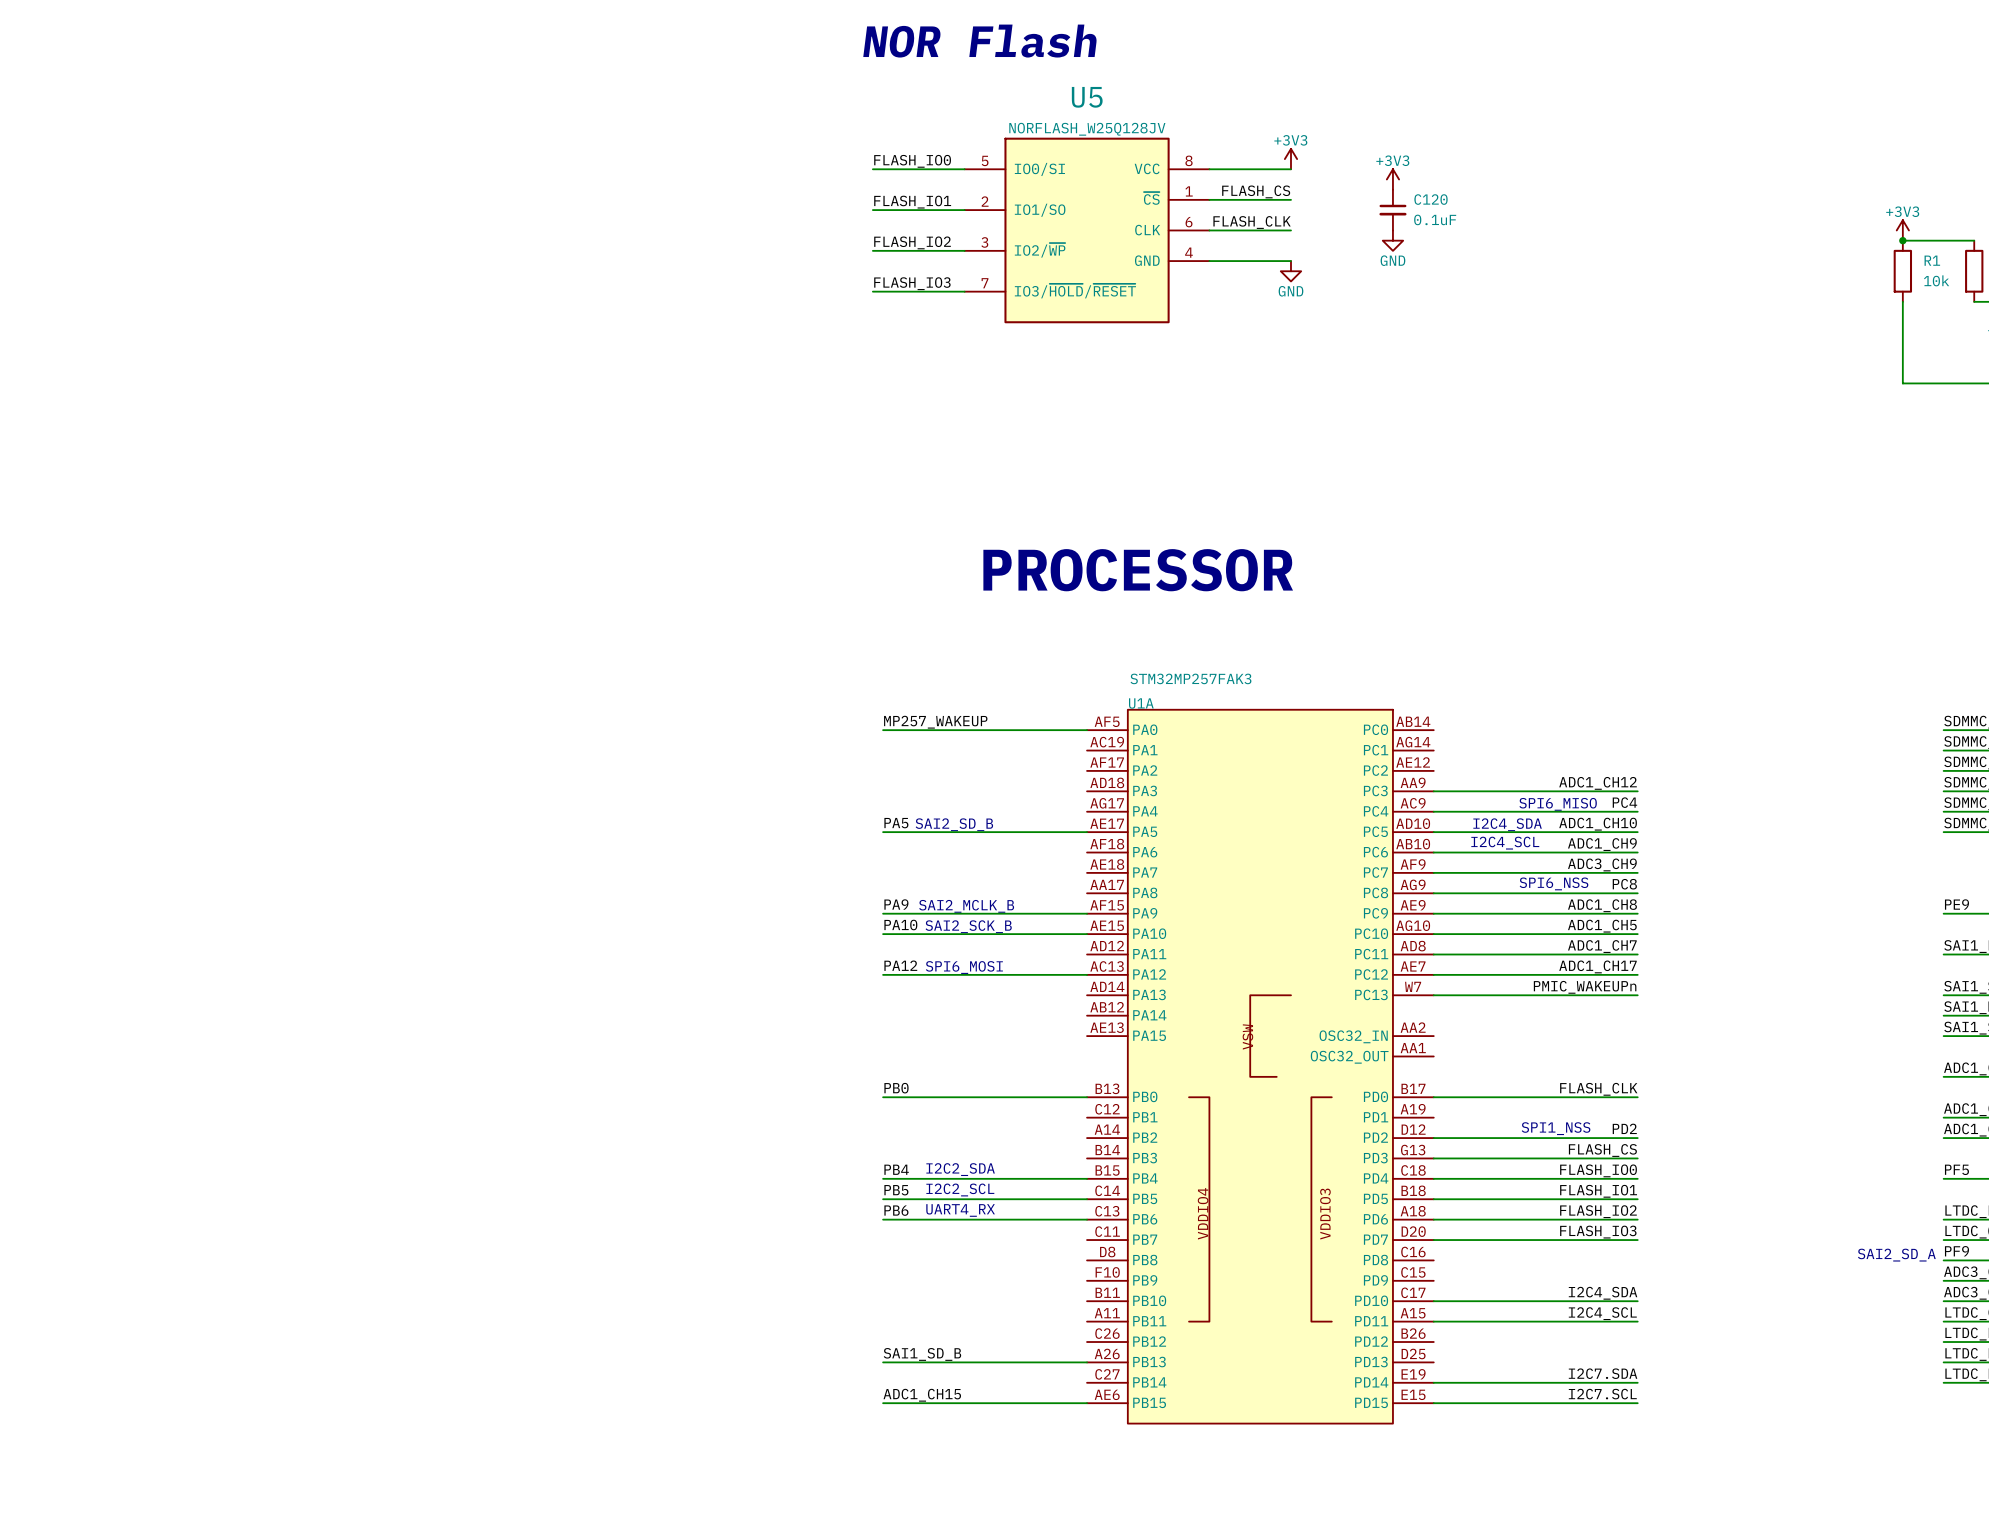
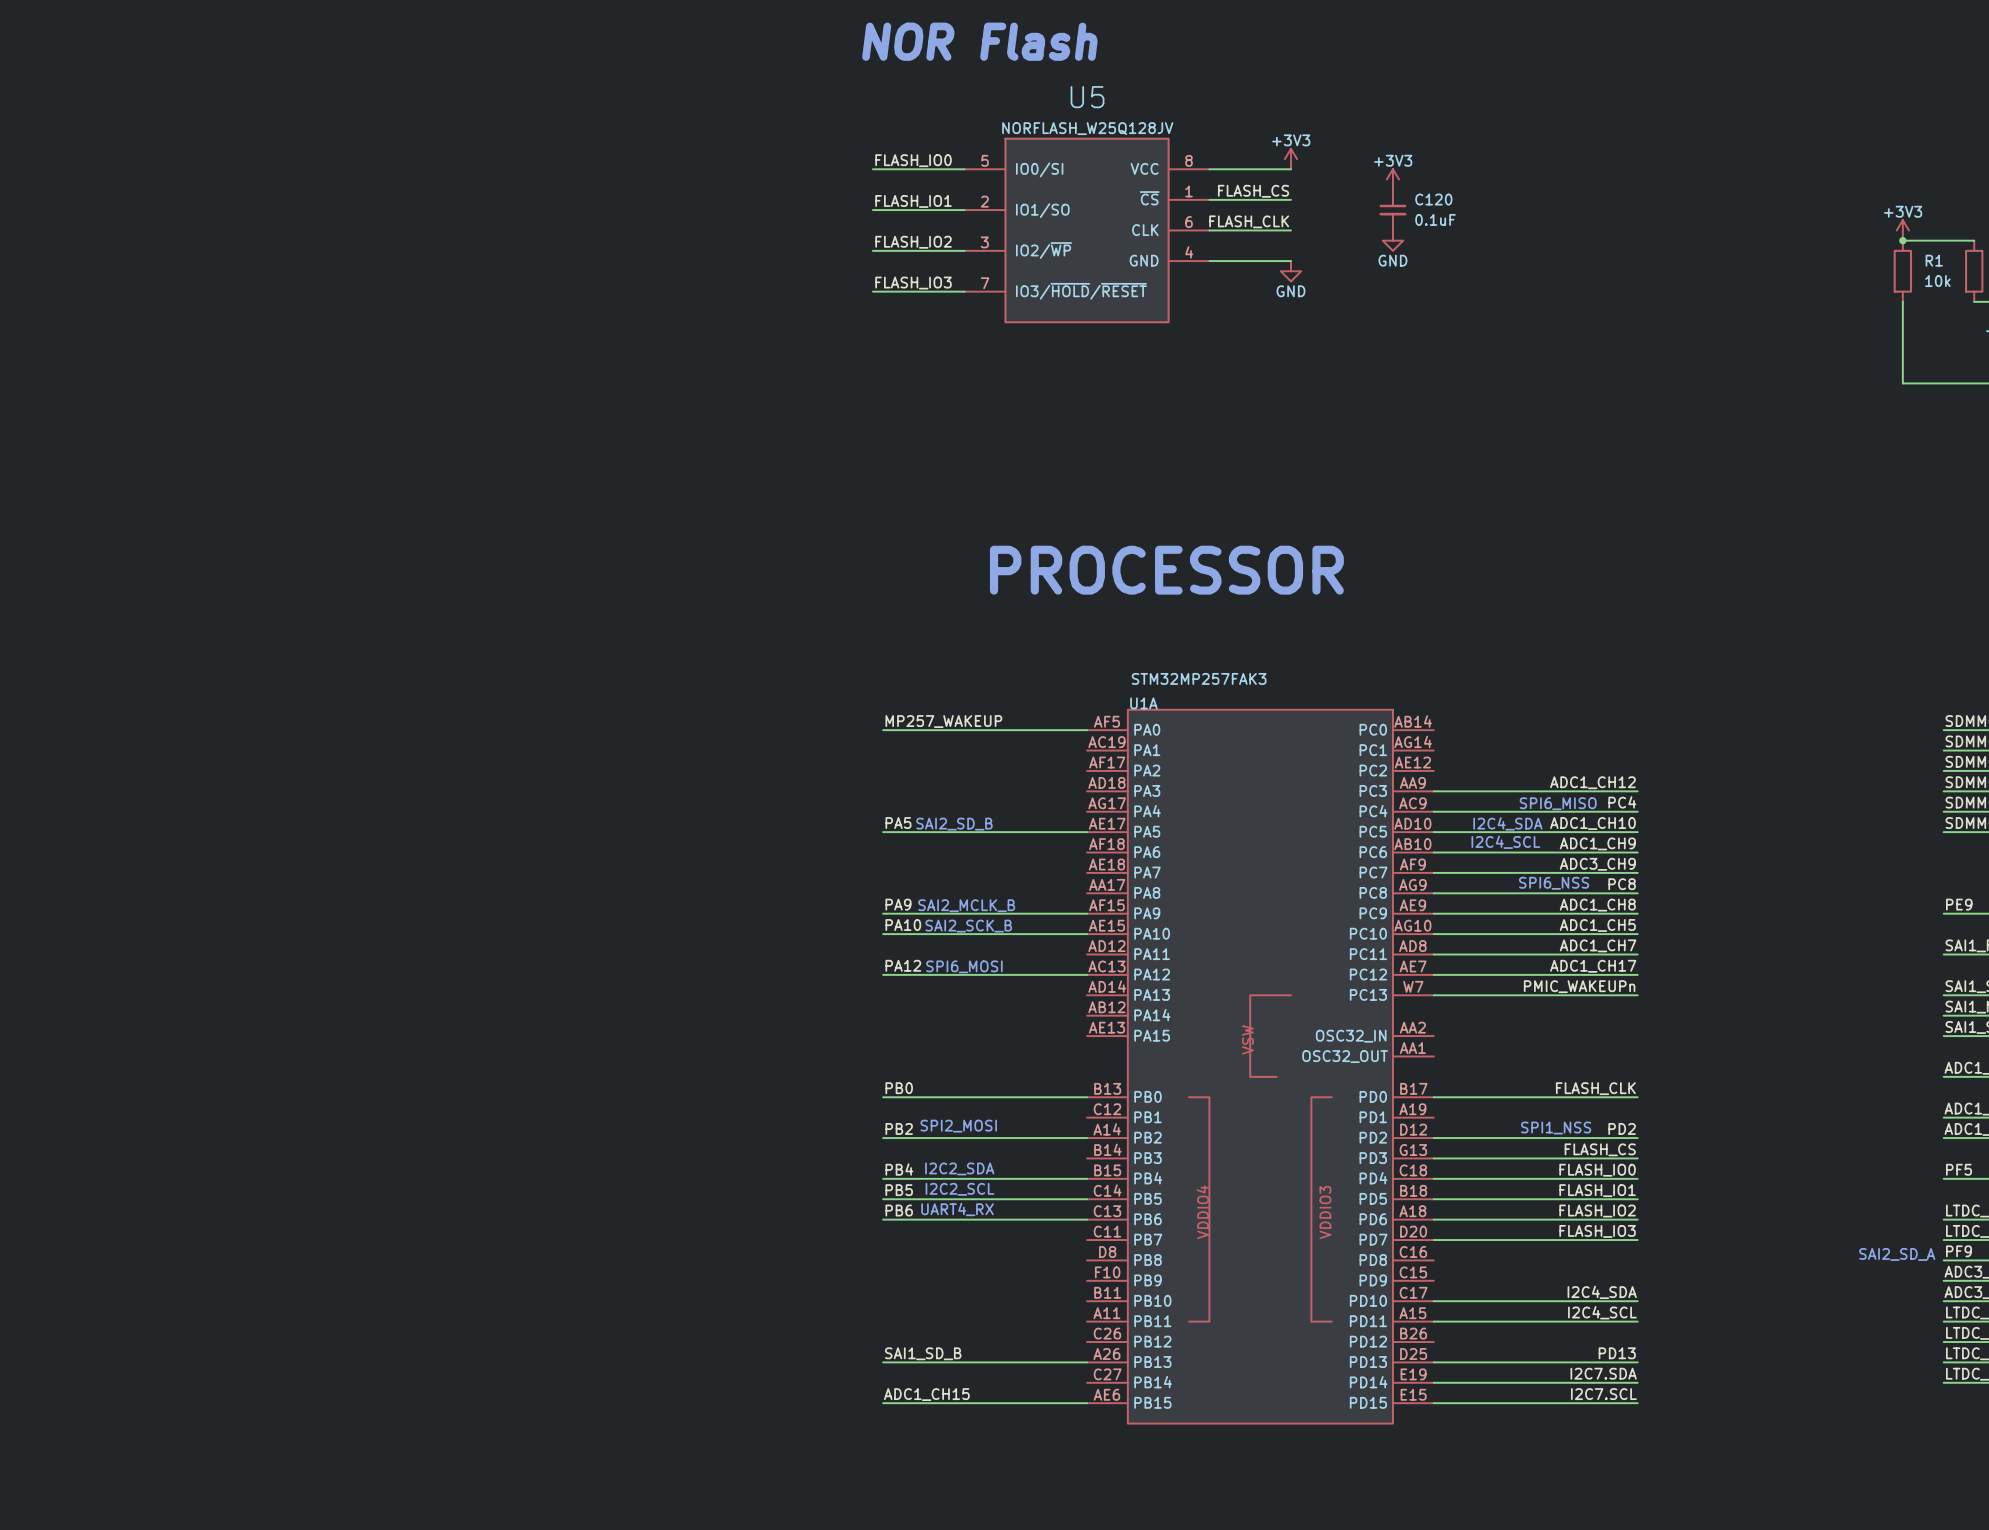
text: none -> SPI2_MOSI (958, 1126)
label: none -> PB2 (899, 1128)
wire: none -> (883, 1138) (1087, 1138)
label: none -> PD13 (1617, 1353)
wire: none -> (1433, 1362) (1637, 1362)

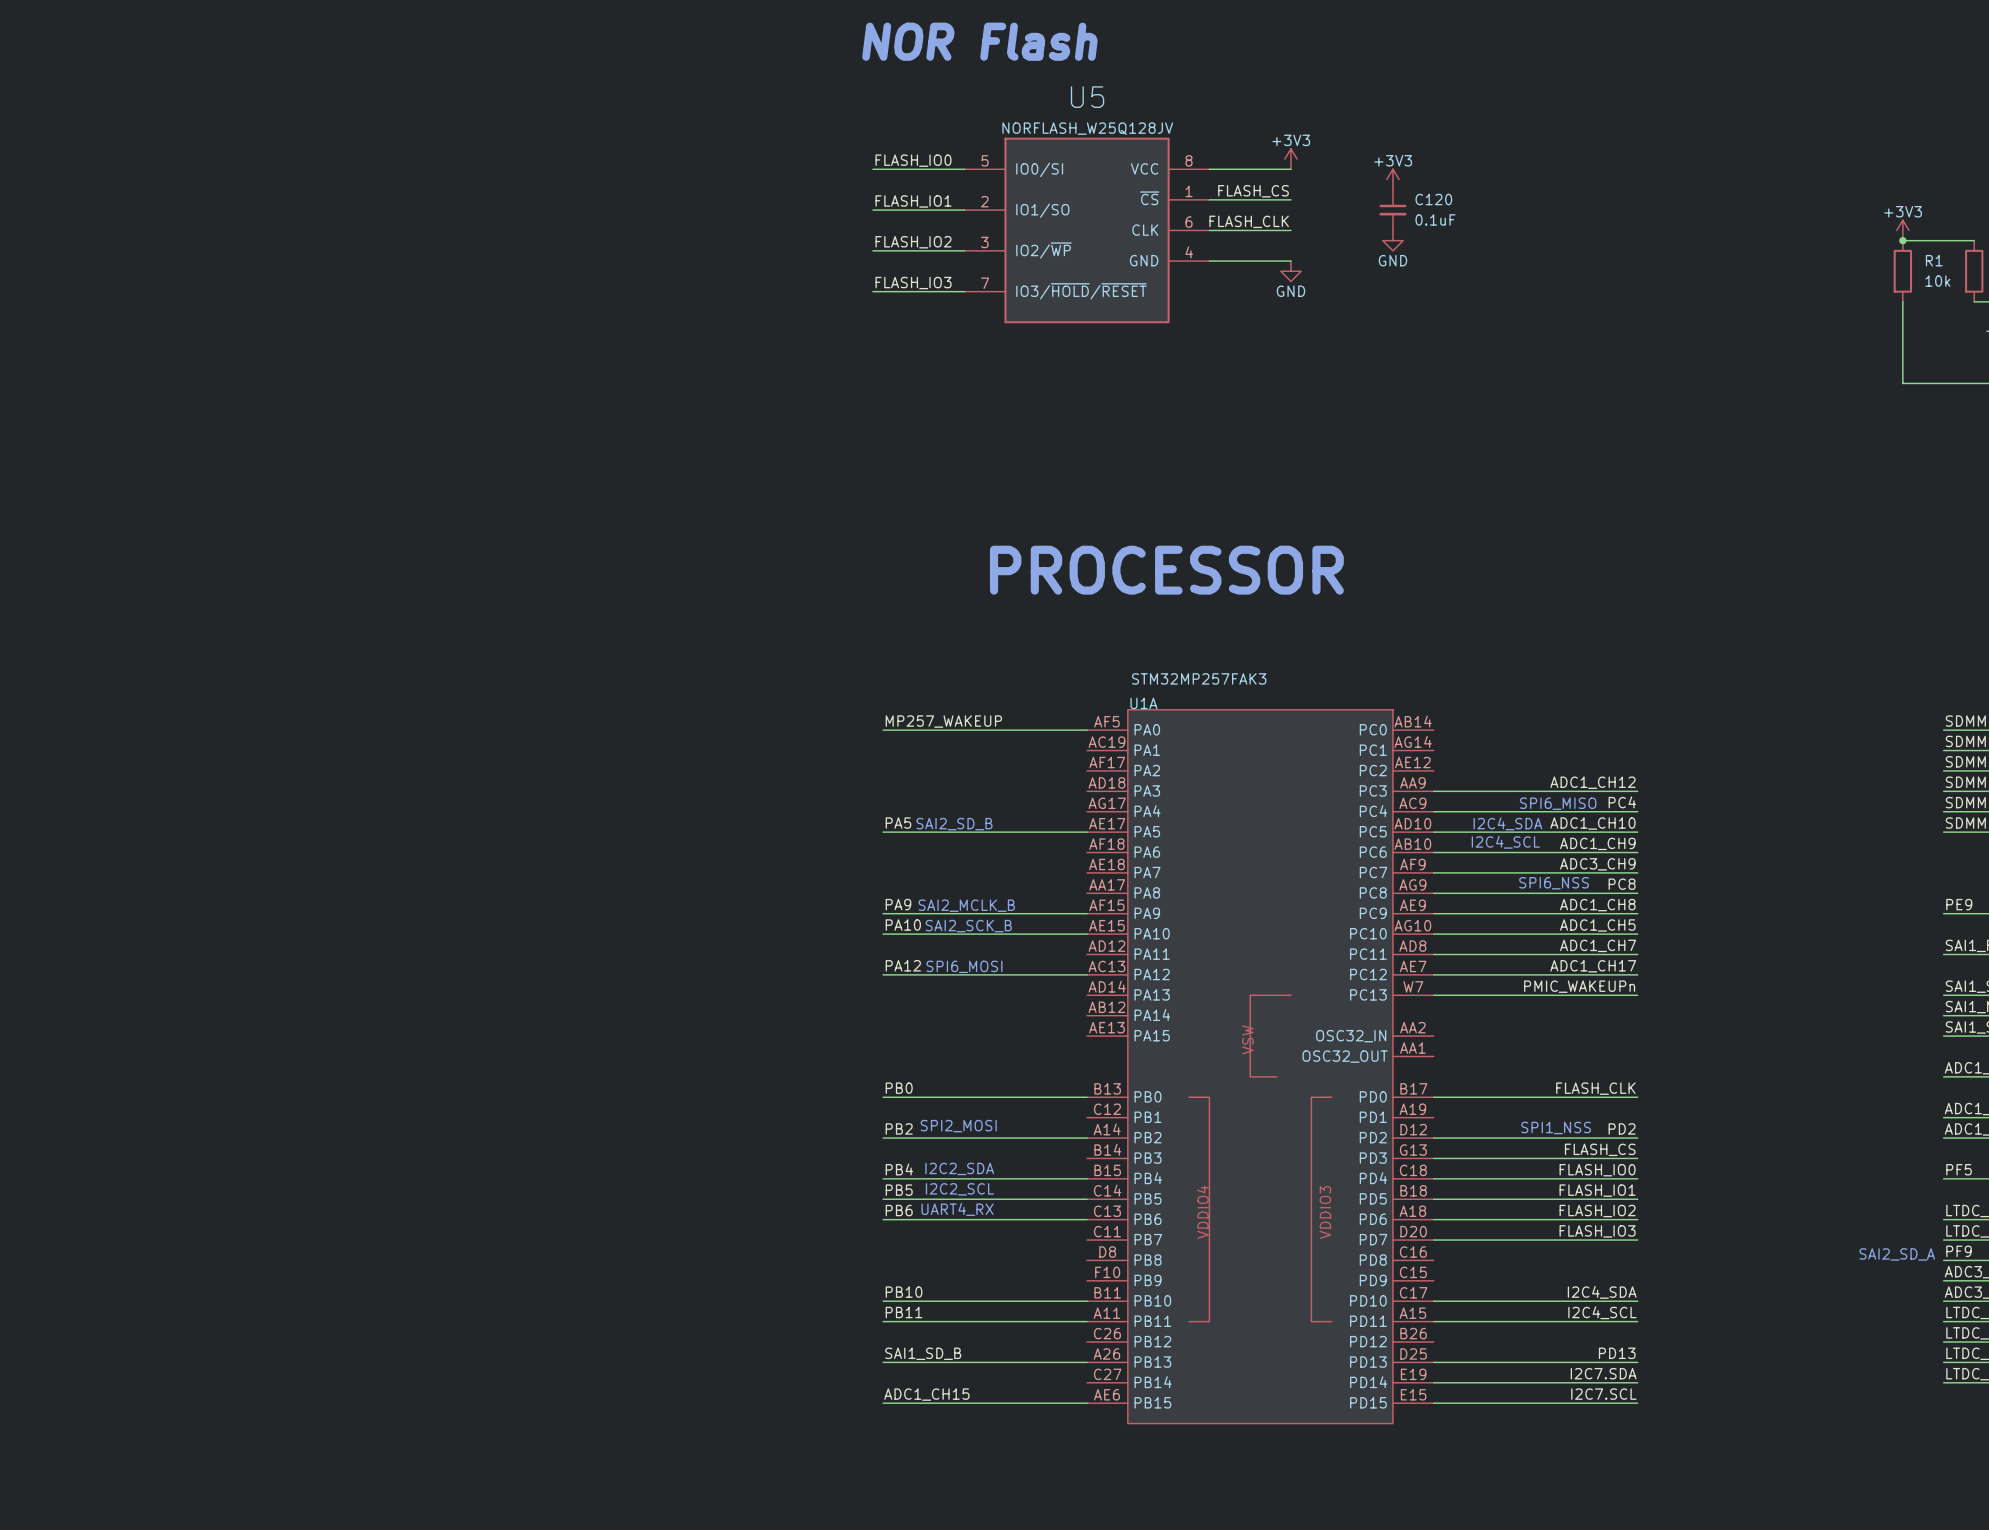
label: none -> PB10 (904, 1292)
wire: none -> (883, 1301) (1087, 1301)
label: none -> PB11 (904, 1312)
wire: none -> (883, 1321) (1087, 1321)

